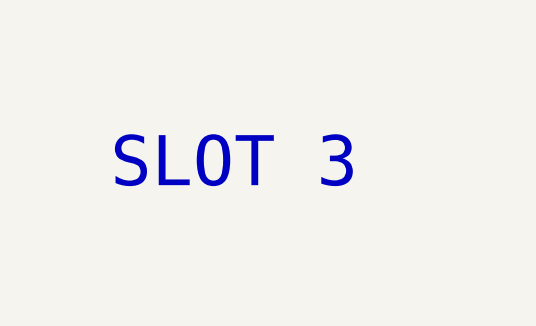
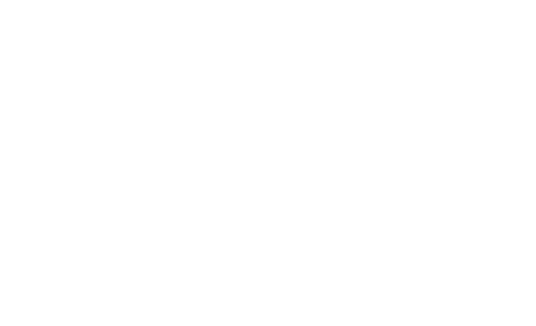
text: SLOT 3 (233, 160) -> none

